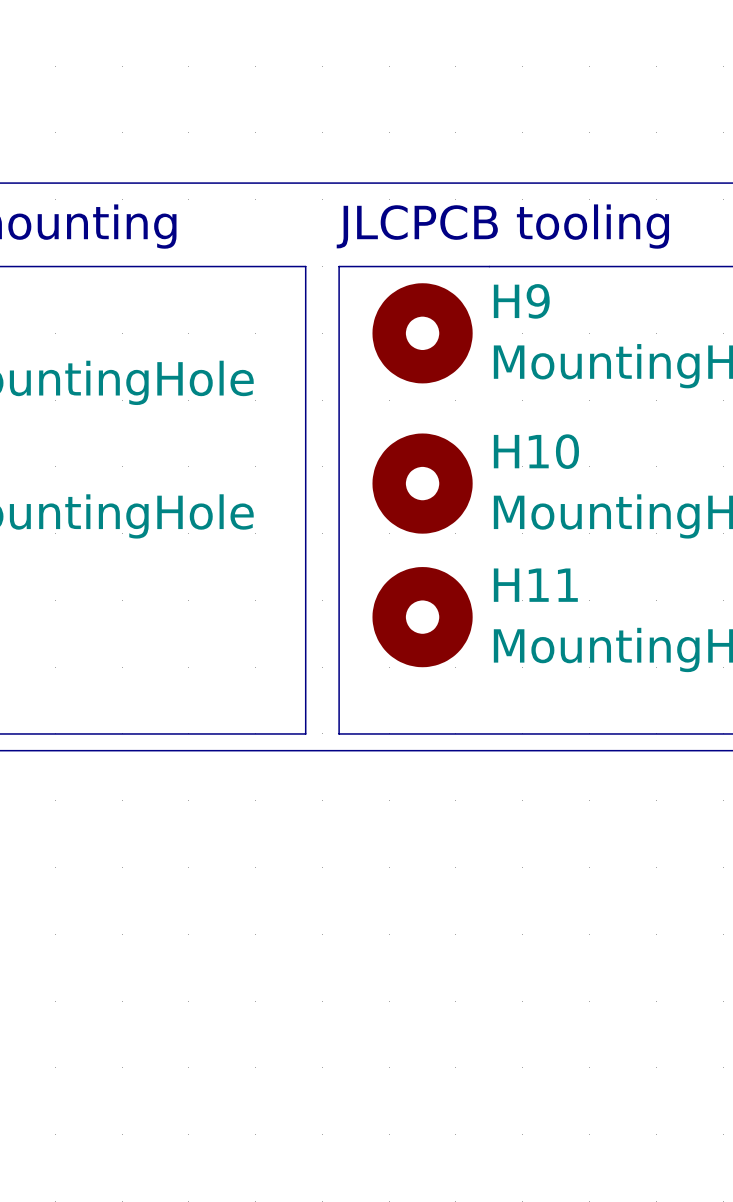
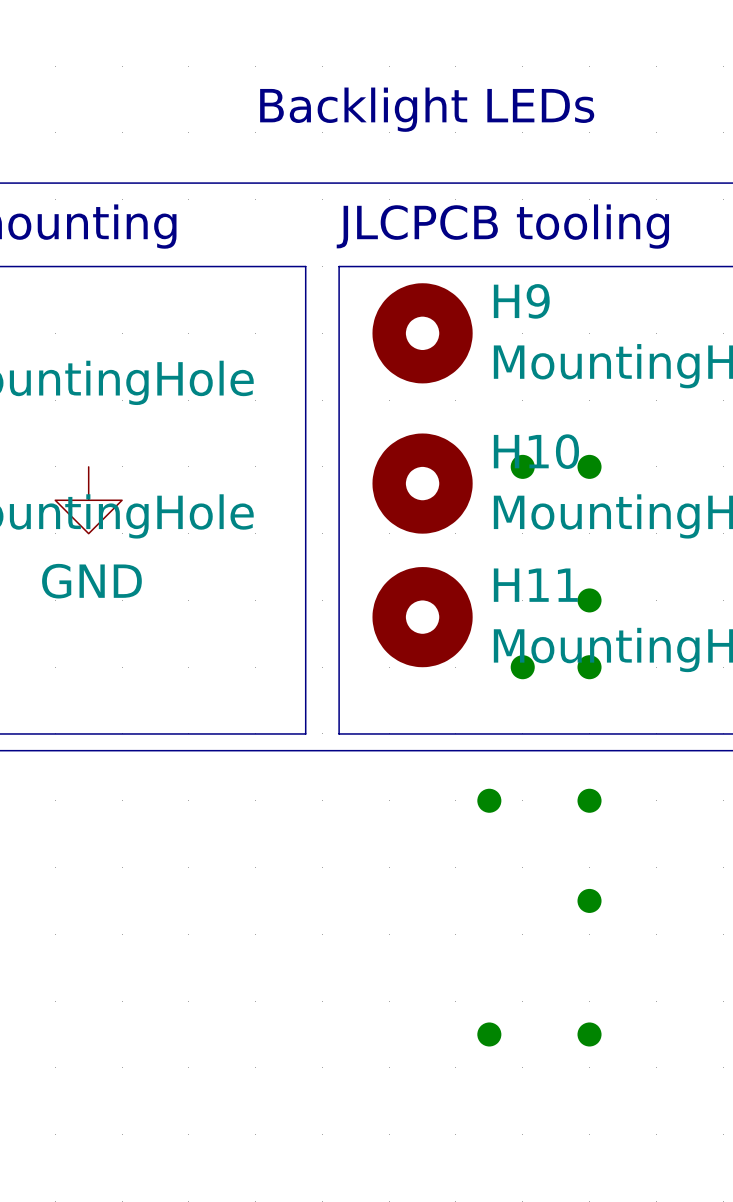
text: none -> Backlight LEDs (427, 109)
junction: none -> (522, 466)
junction: none -> (589, 466)
power symbol: none -> GND (88, 500)
junction: none -> (589, 600)
junction: none -> (522, 667)
junction: none -> (589, 667)
junction: none -> (489, 800)
junction: none -> (589, 800)
junction: none -> (589, 900)
junction: none -> (489, 1034)
junction: none -> (589, 1034)

